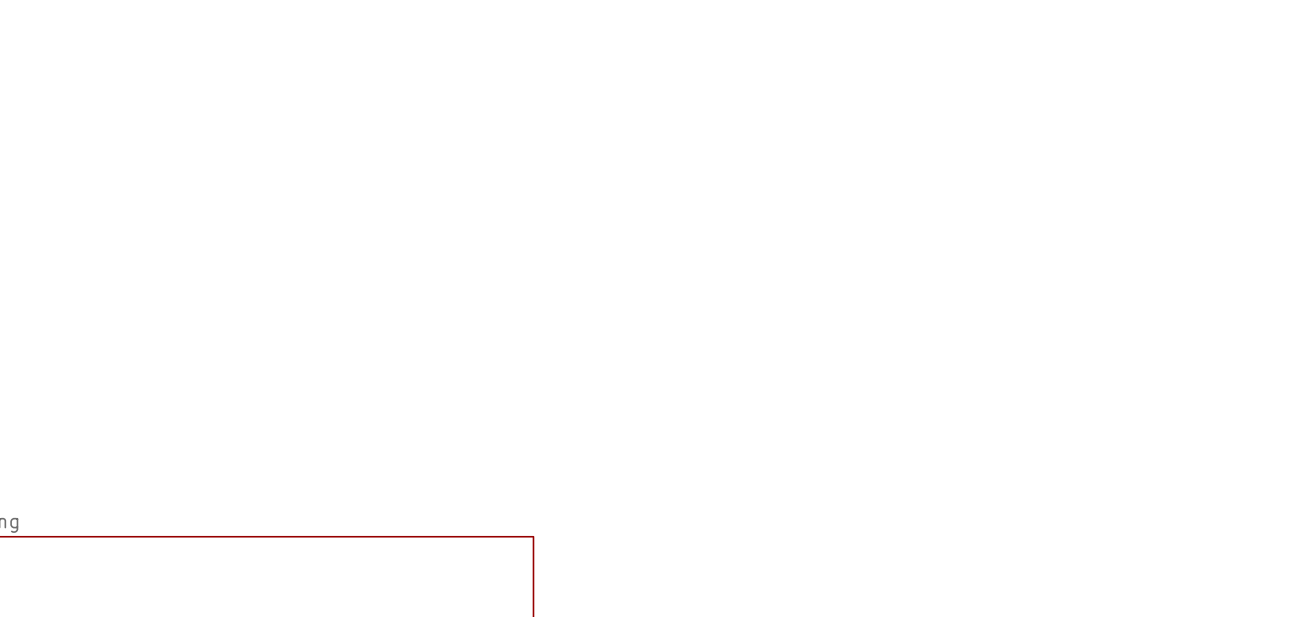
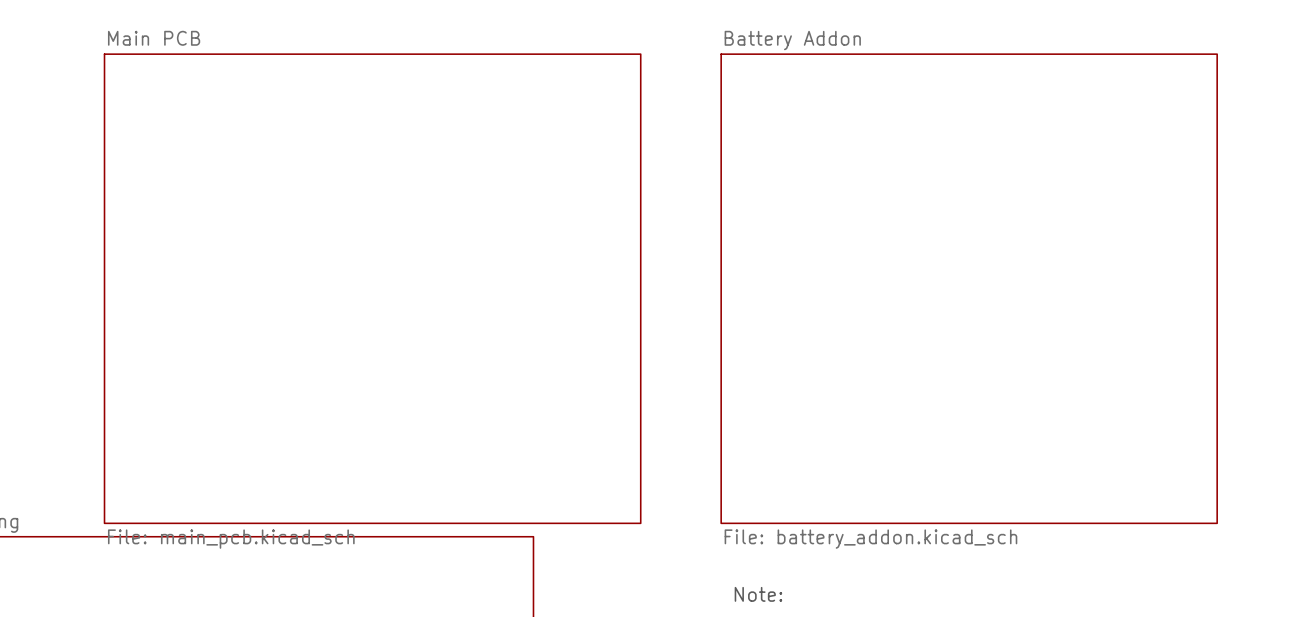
sheet Main PCB: none -> File: main_pcb.kicad_sch (372, 288)
sheet Battery Addon: none -> File: battery_addon.kicad_sch (969, 288)
text: none -> Note: (758, 594)

